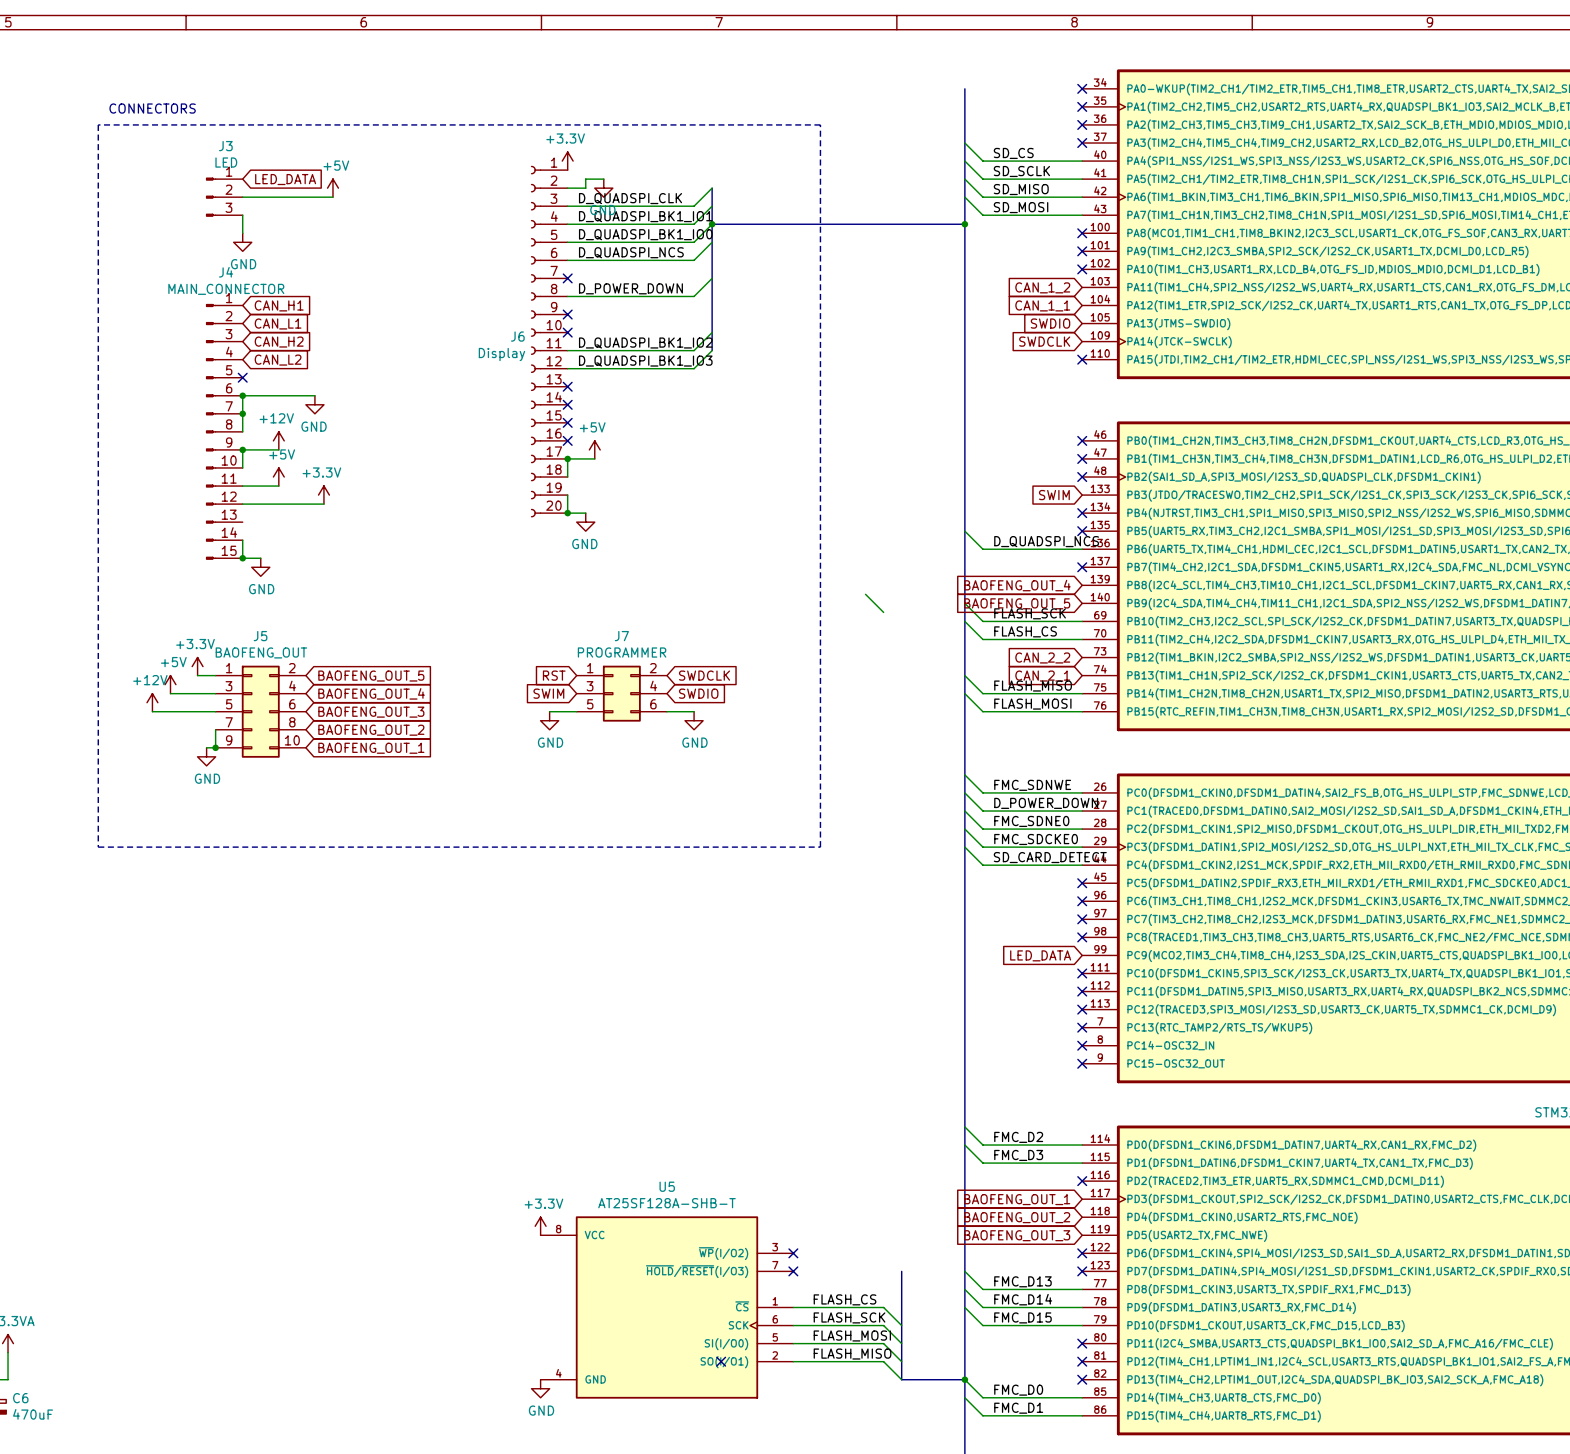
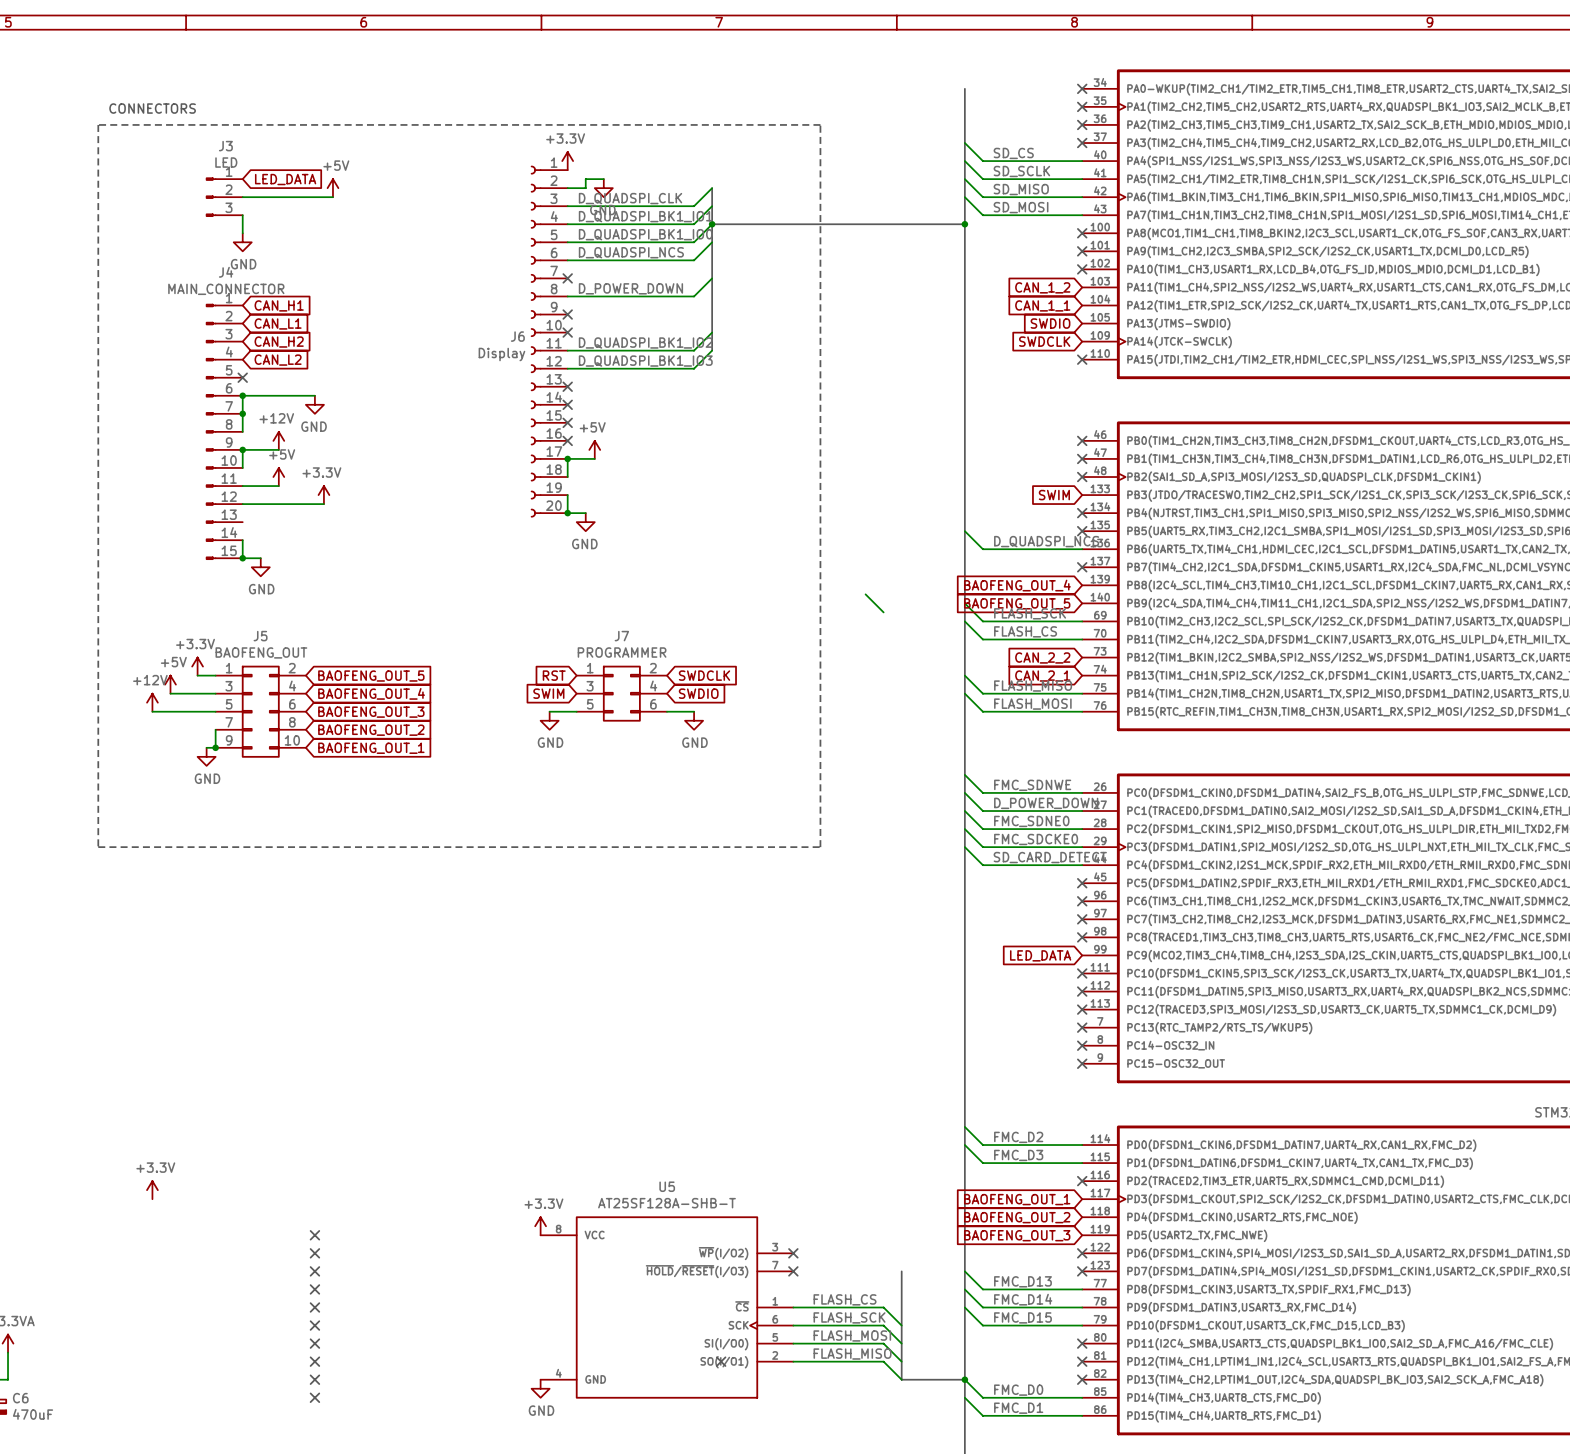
power symbol: none -> +3.3V (152, 1190)
no-connect mark: none -> (314, 1235)
no-connect mark: none -> (314, 1253)
no-connect mark: none -> (314, 1271)
no-connect mark: none -> (314, 1289)
no-connect mark: none -> (314, 1307)
no-connect mark: none -> (314, 1325)
no-connect mark: none -> (314, 1343)
no-connect mark: none -> (314, 1361)
no-connect mark: none -> (314, 1379)
no-connect mark: none -> (314, 1397)

